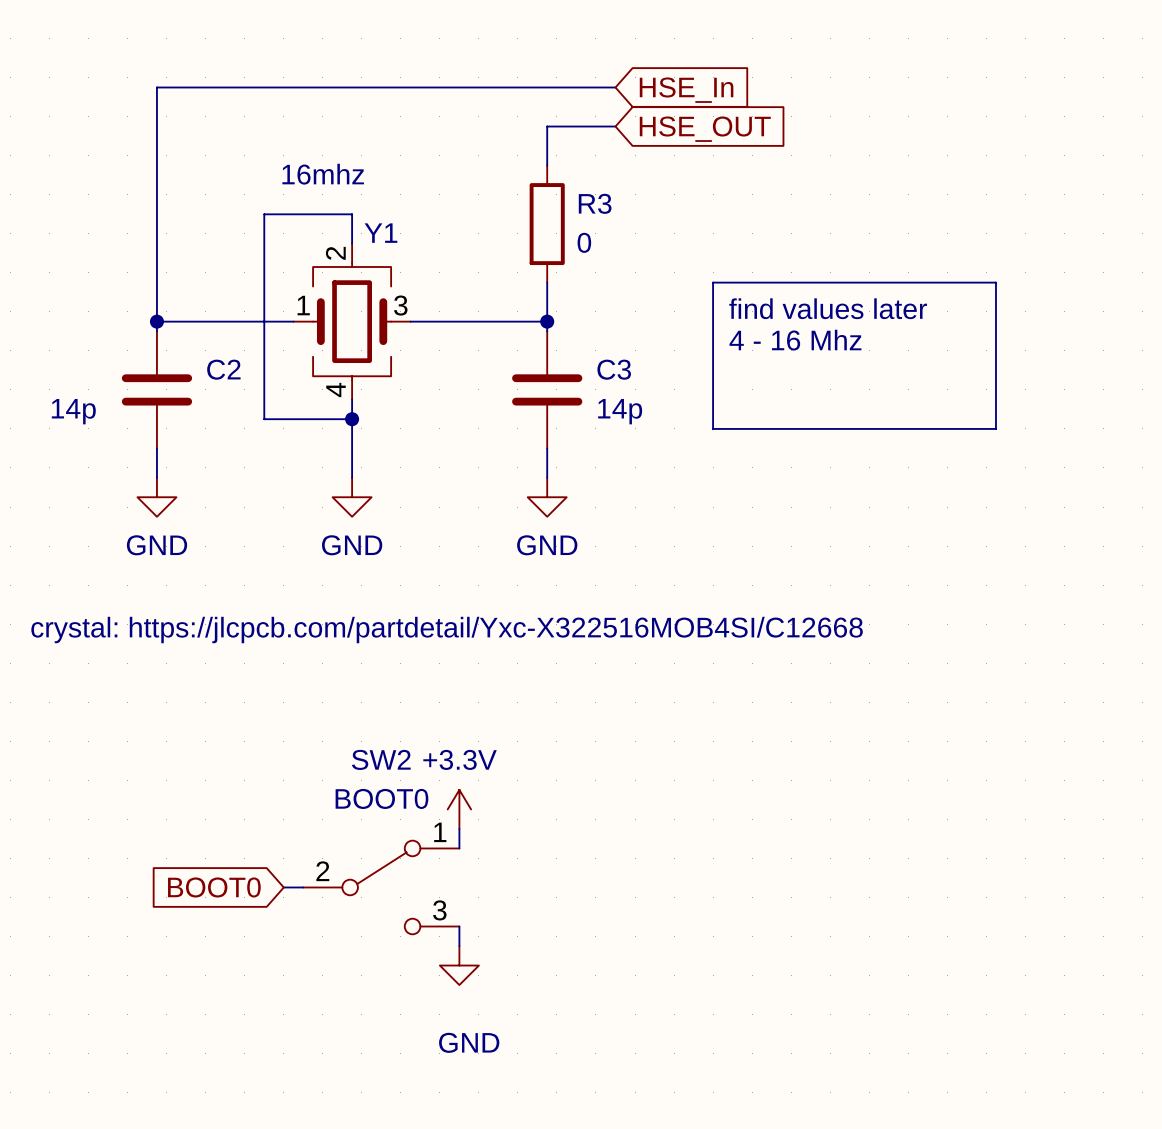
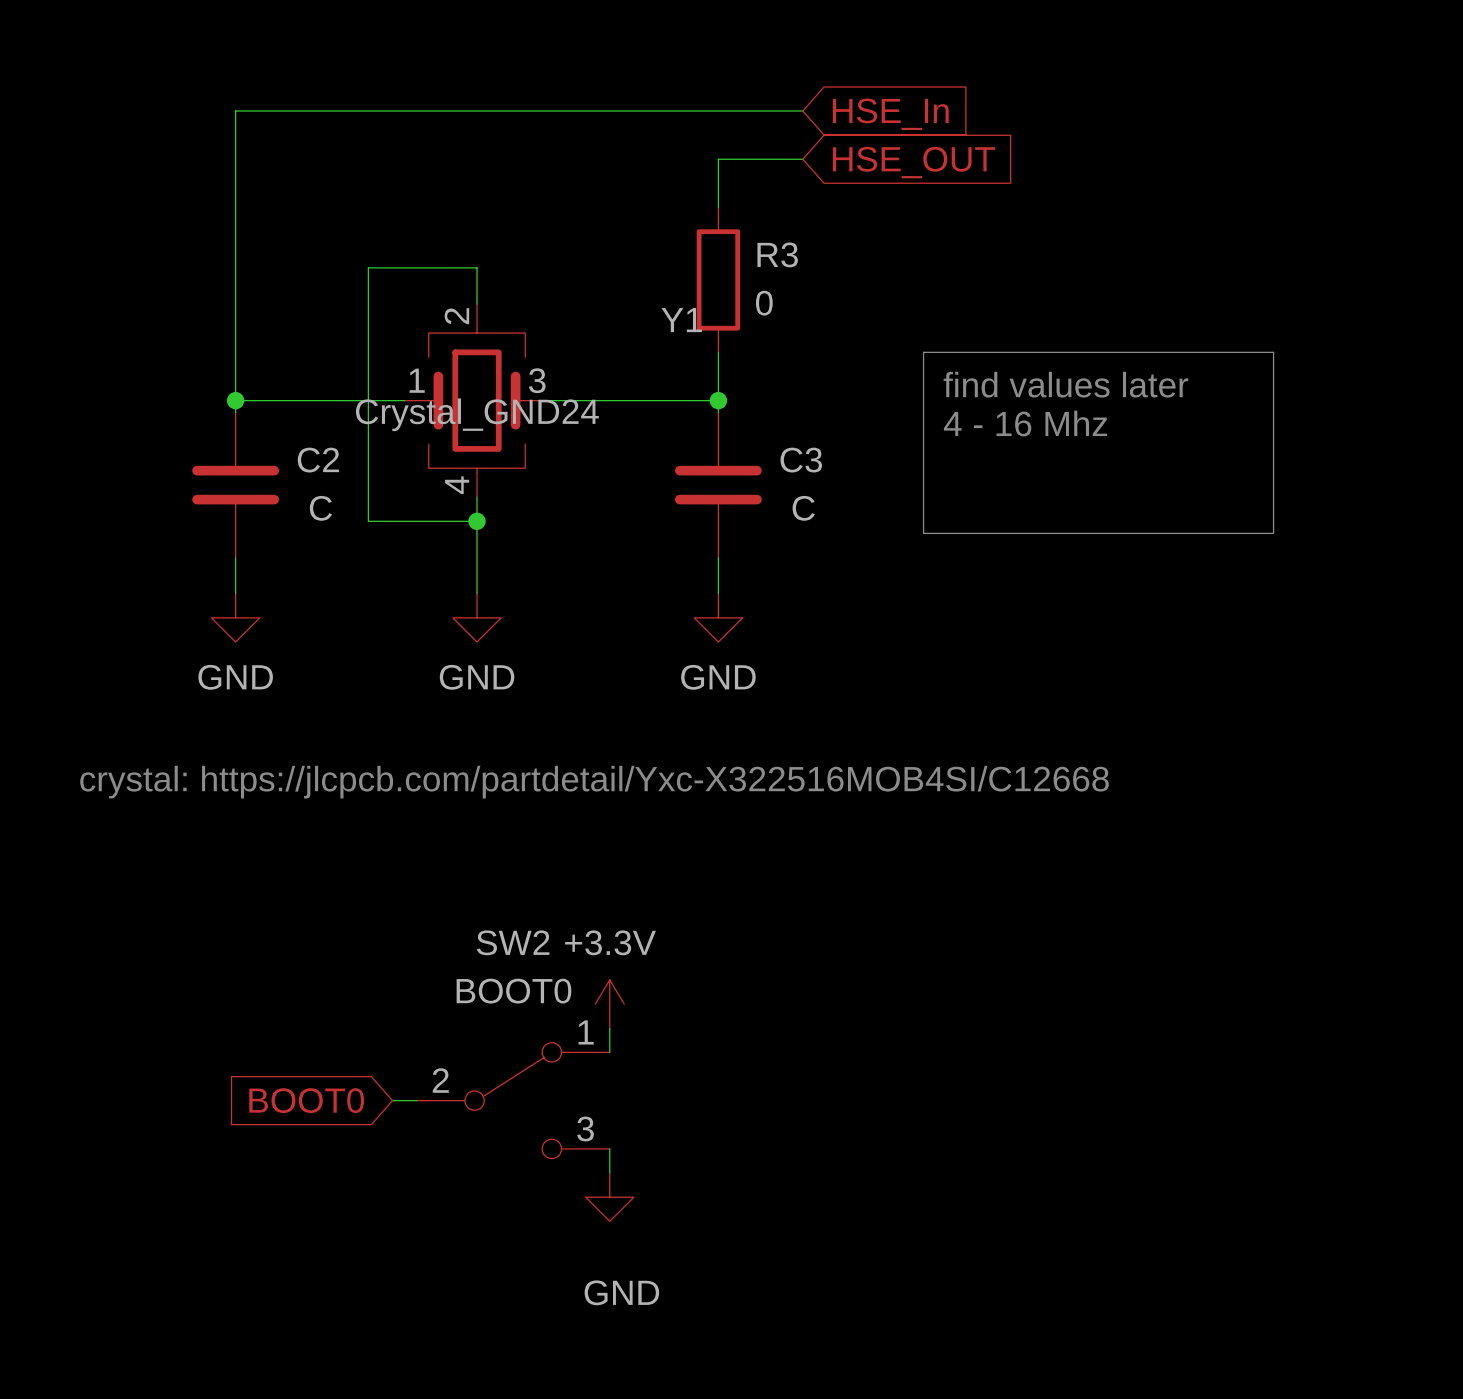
Y1 value: 16mhz (323, 174) -> Crystal_GND24 (477, 414)
Y1 name position: Y1 (380, 233) -> Y1 (681, 320)
C2 value: 14p (73, 411) -> C (320, 508)
C3 value: 14p (620, 411) -> C (803, 508)

